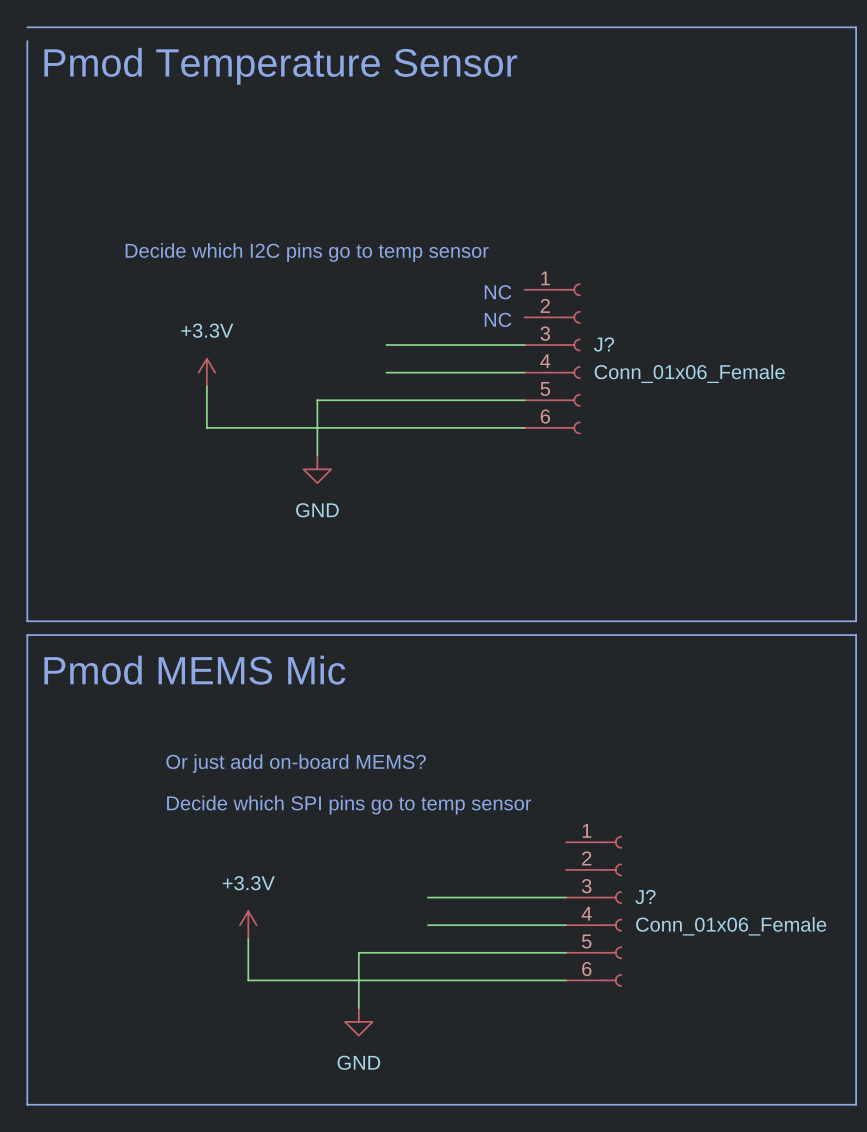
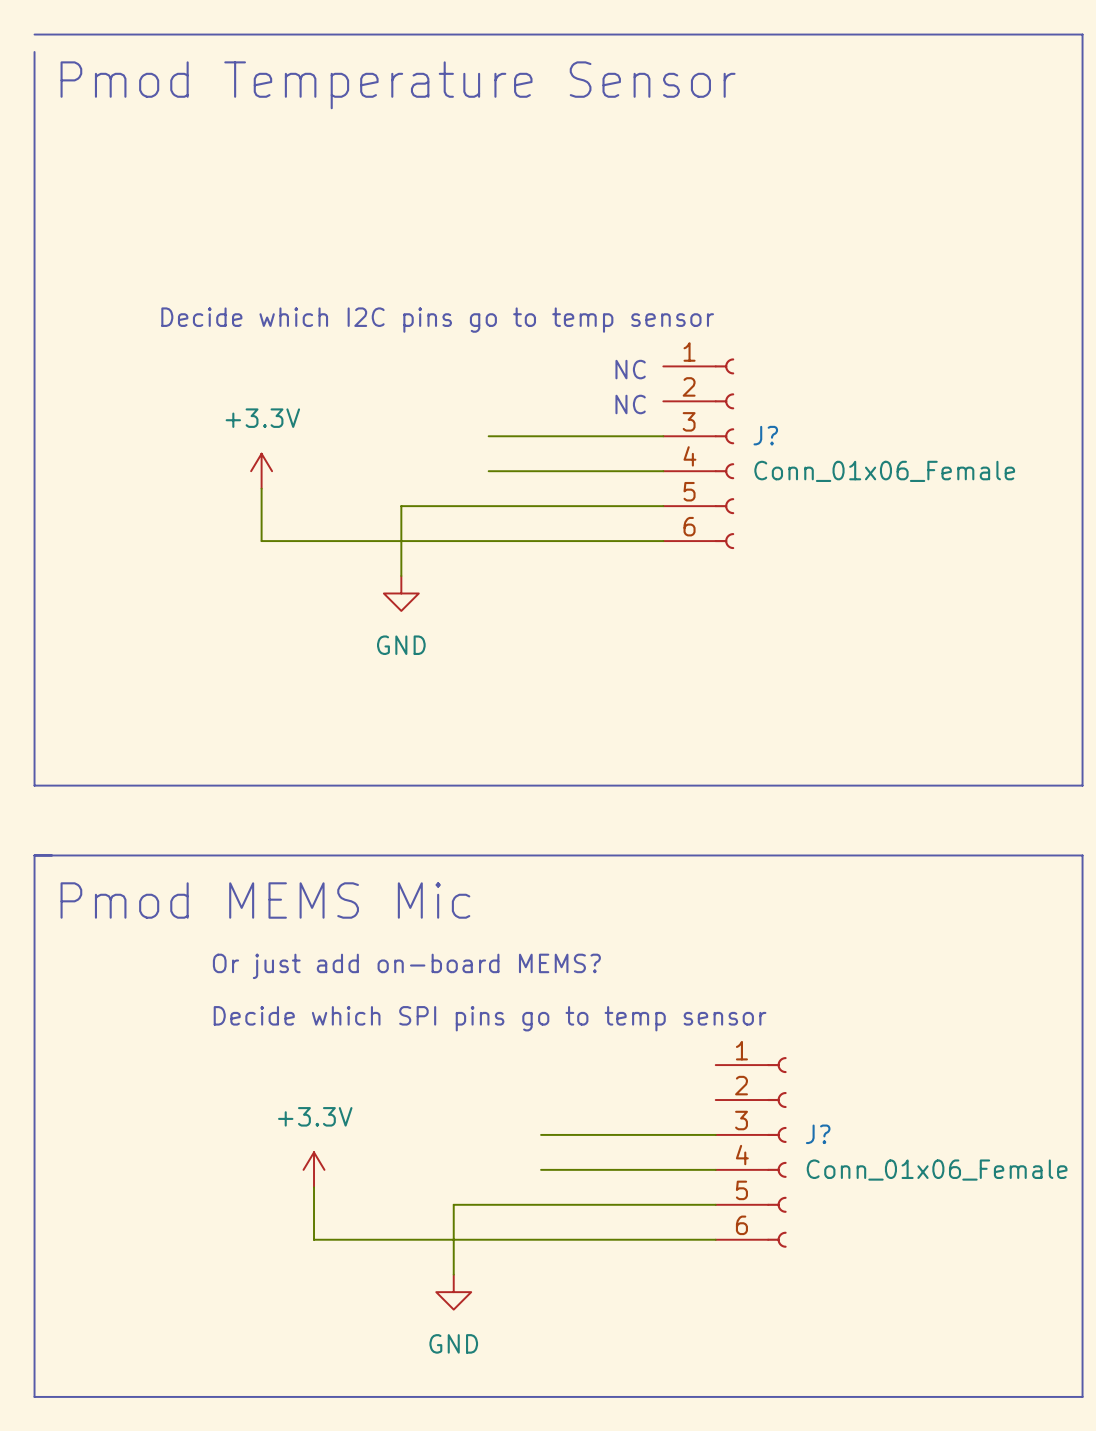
text position: Pmod MEMS Mic (194, 670) -> Pmod MEMS Mic (265, 900)
line: (27, 676) (27, 635) (856, 635) (856, 676) -> (34, 855) (1082, 855)

